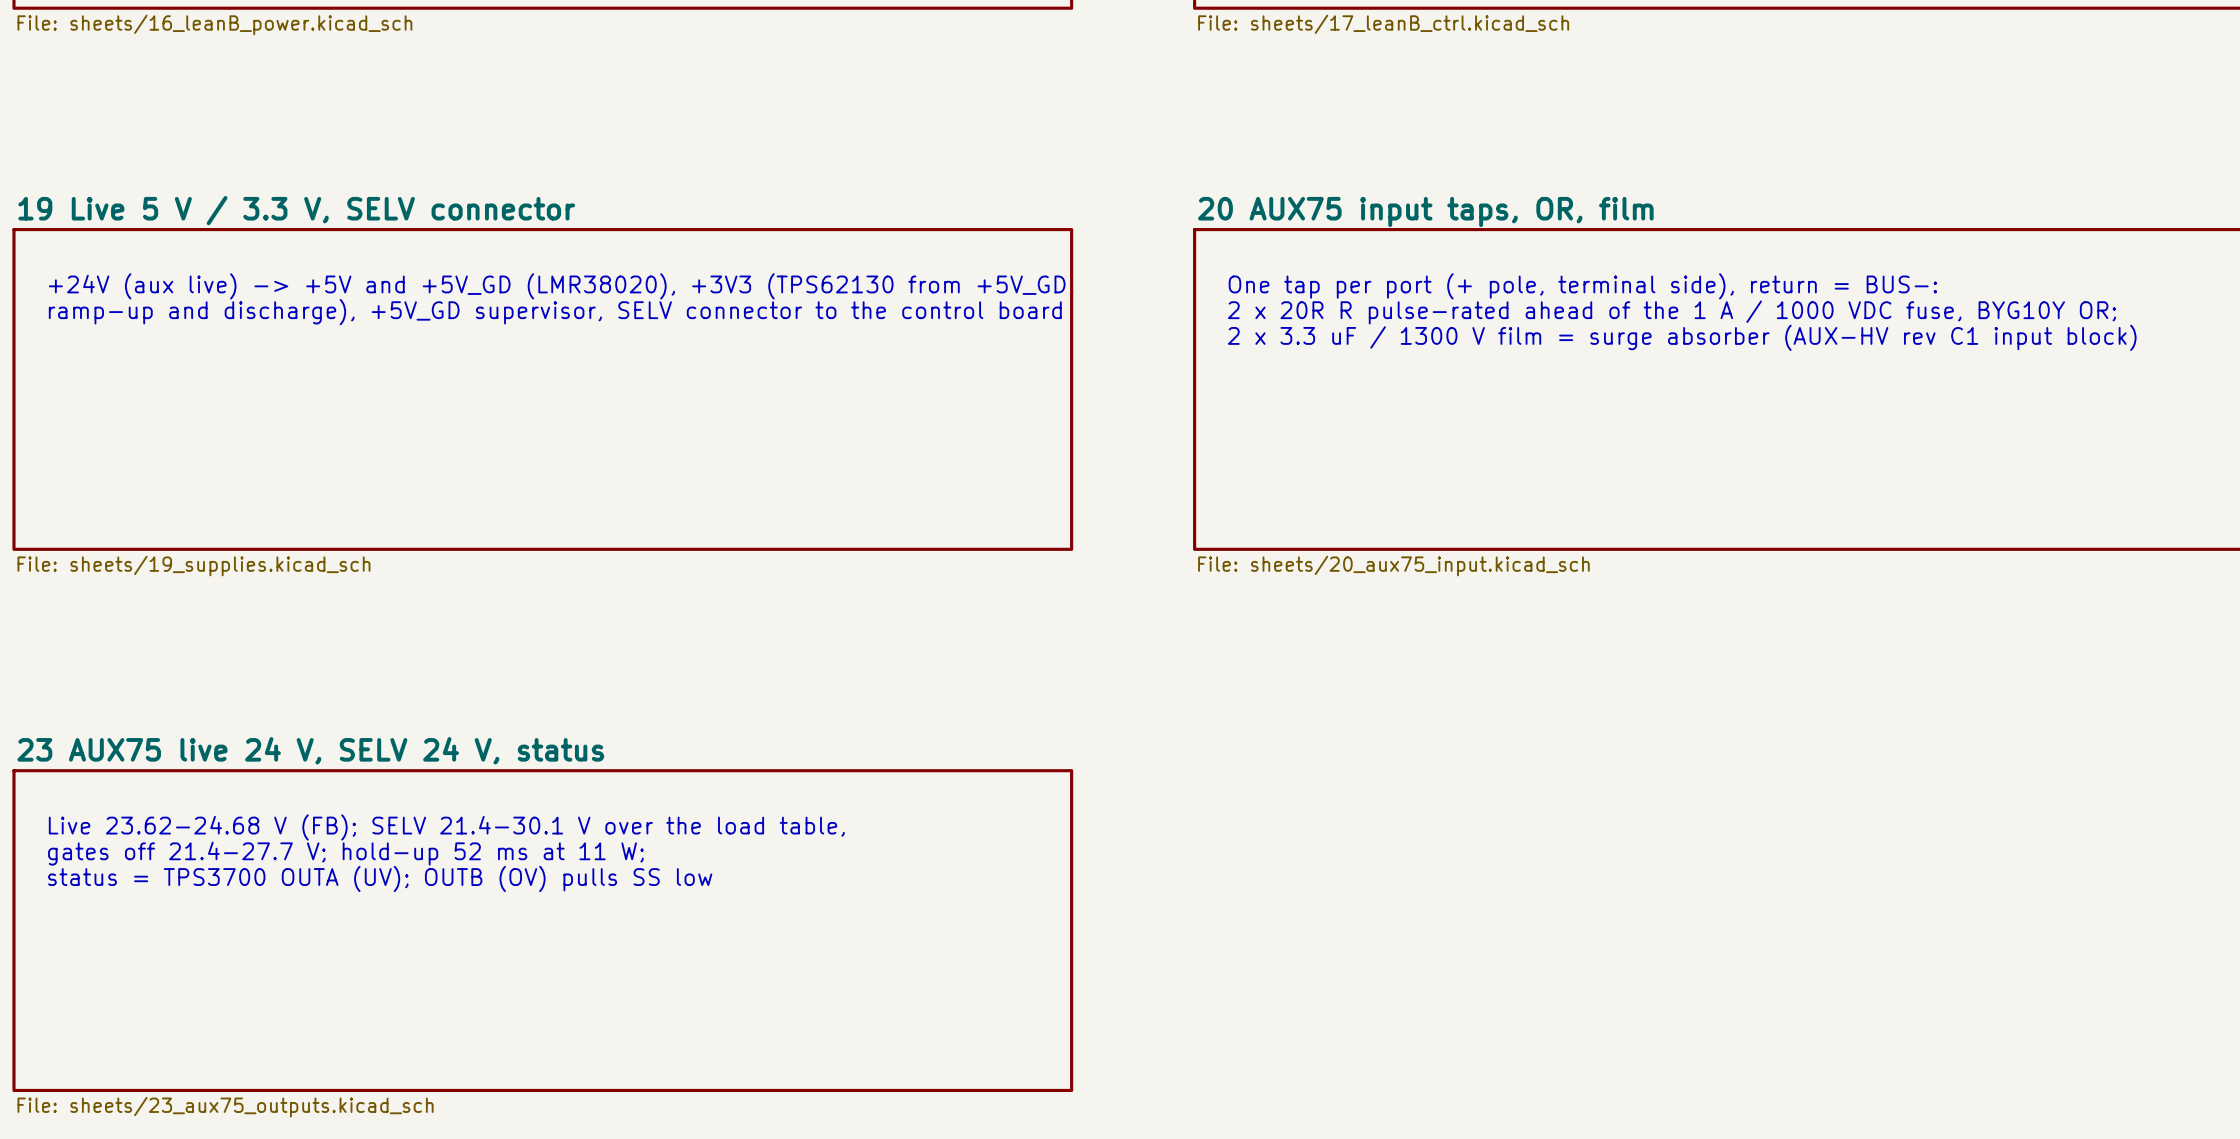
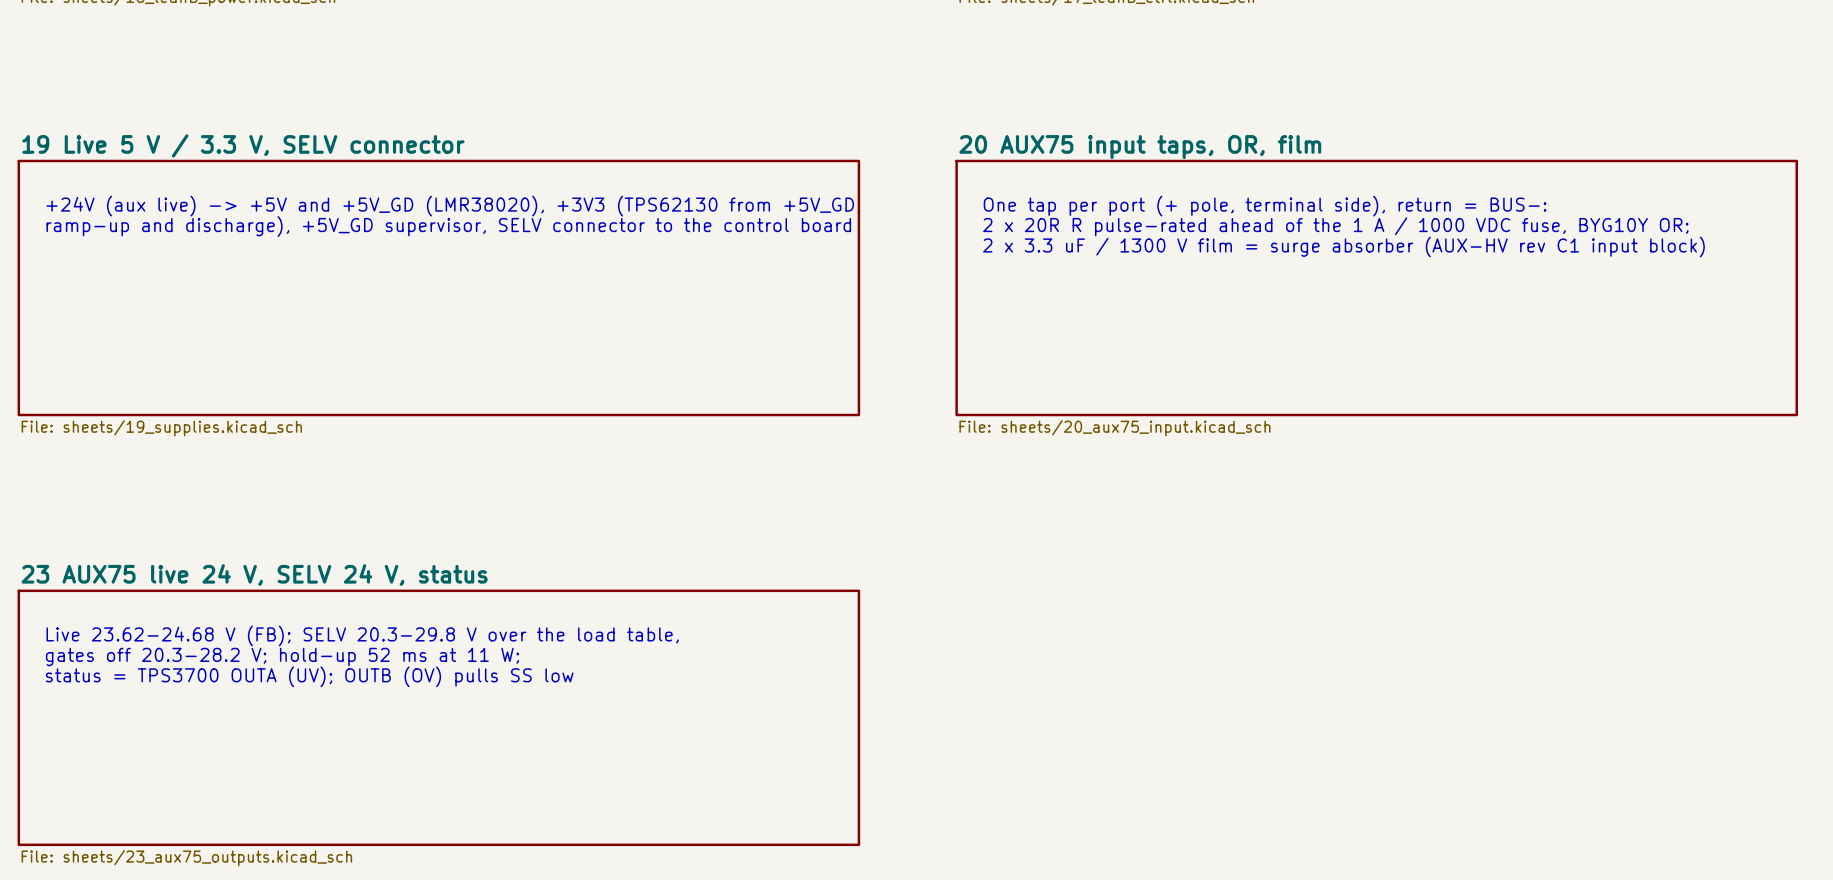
text: Live 23.62-24.68 V (FB); SELV 21.4-30.1 V over the load table, (446, 827) -> Live 23.62-24.68 V (FB); SELV 20.3-29.8 V over the load table, (362, 635)
text: gates off 21.4-27.7 V; hold-up 52 ms at 11 W; (345, 853) -> gates off 20.3-28.2 V; hold-up 52 ms at 11 W; (282, 656)

